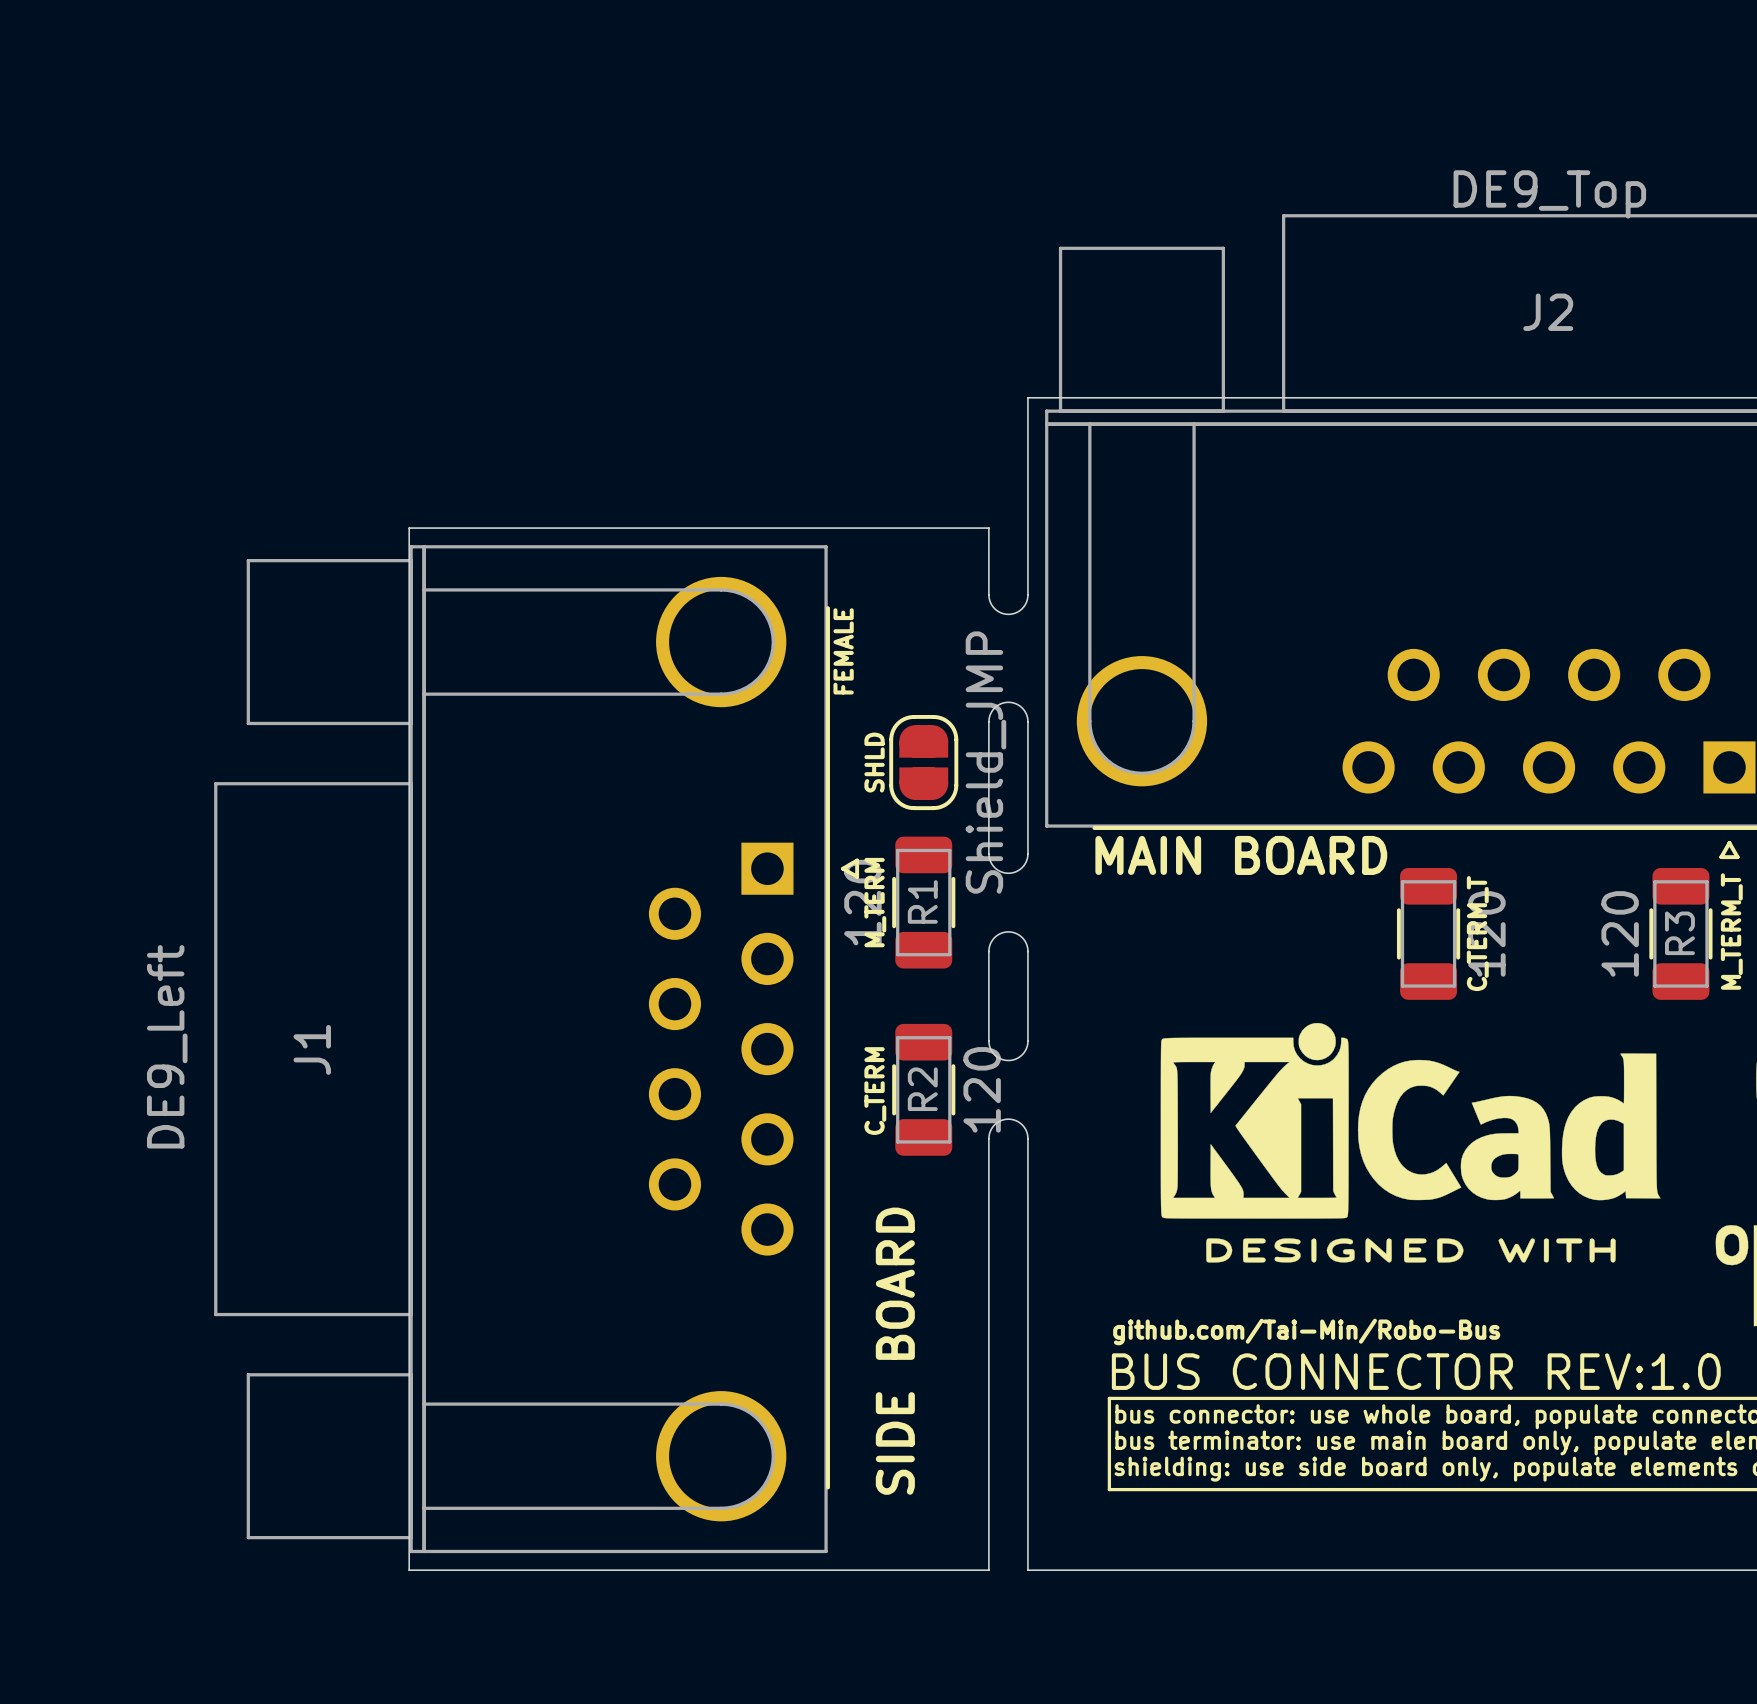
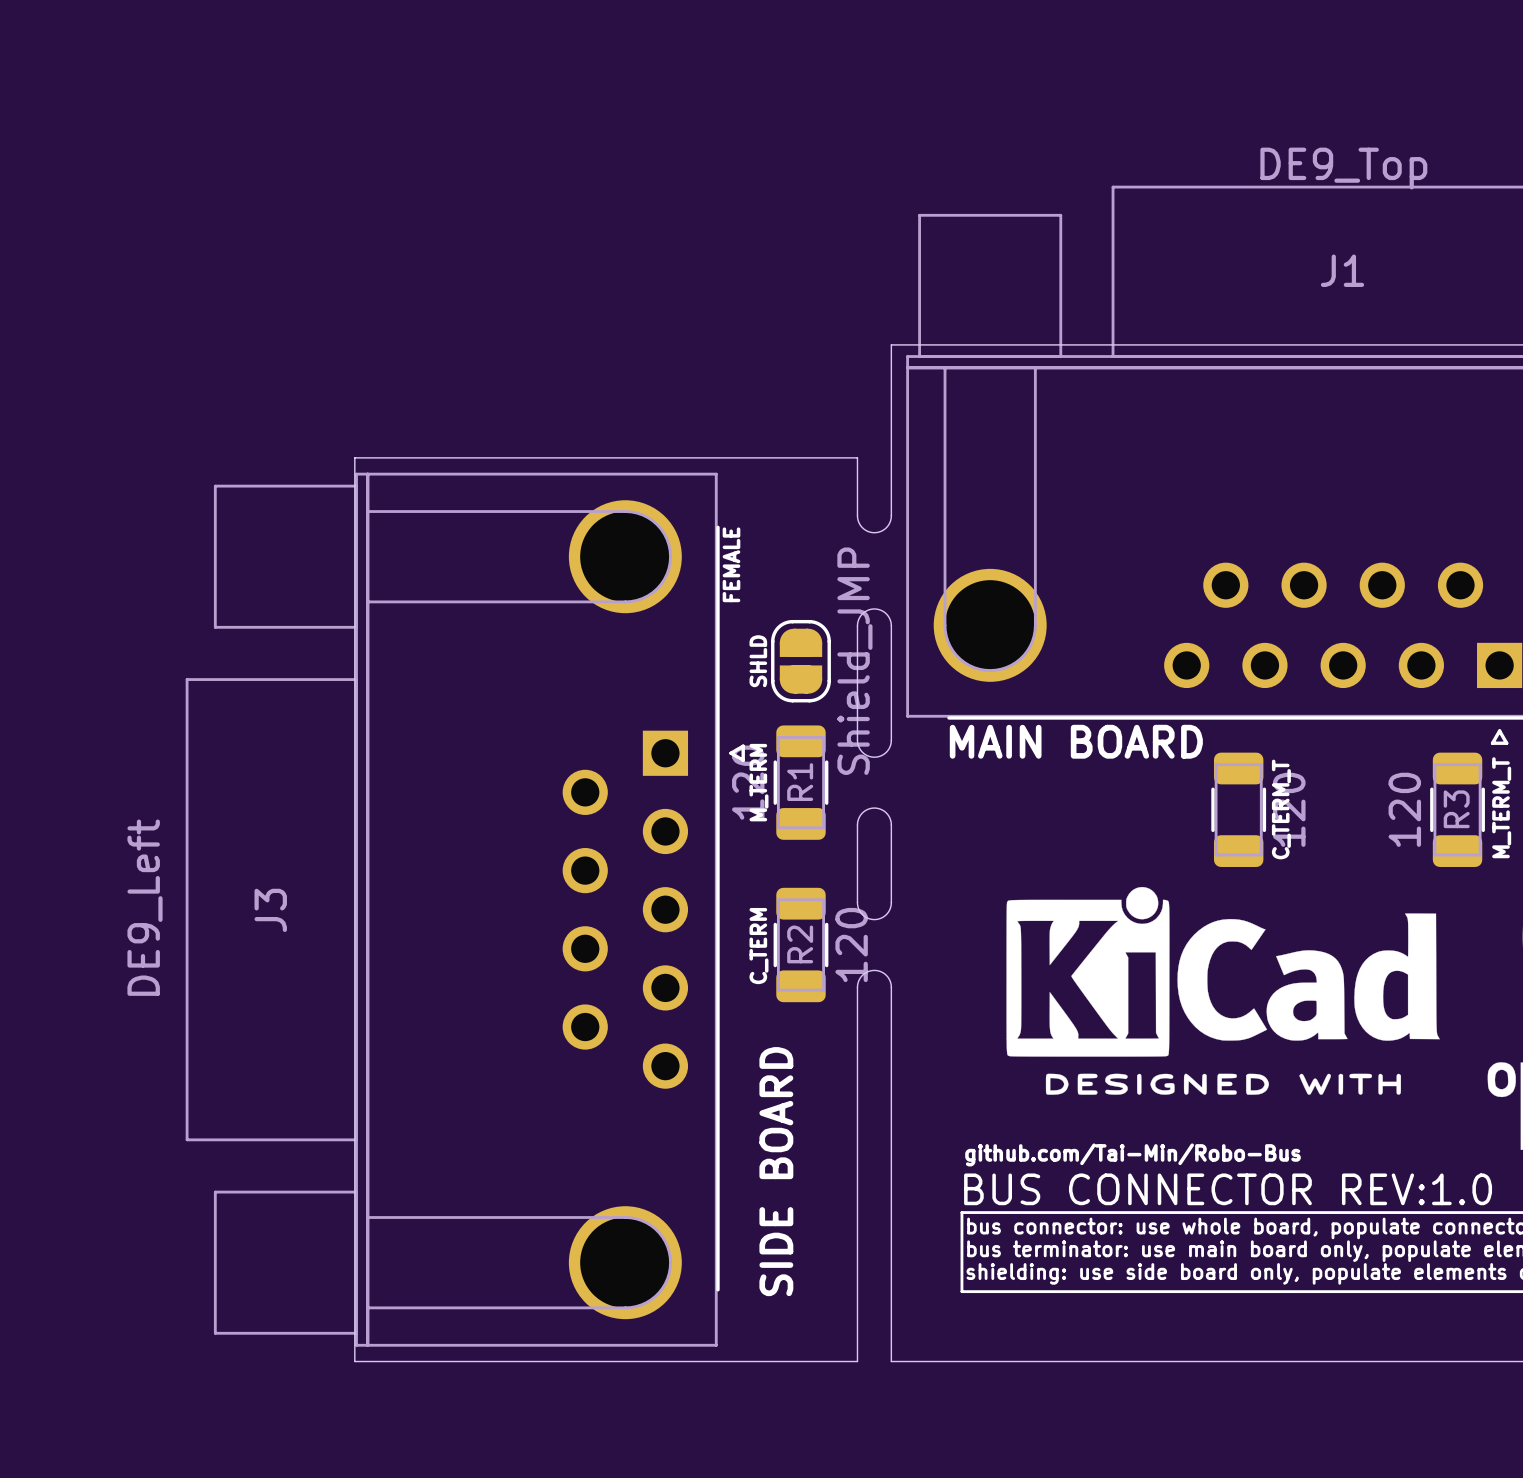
J2 name: J2 (1548, 312) -> J1 (1342, 270)
J1 name: J1 (312, 1049) -> J3 (270, 910)

